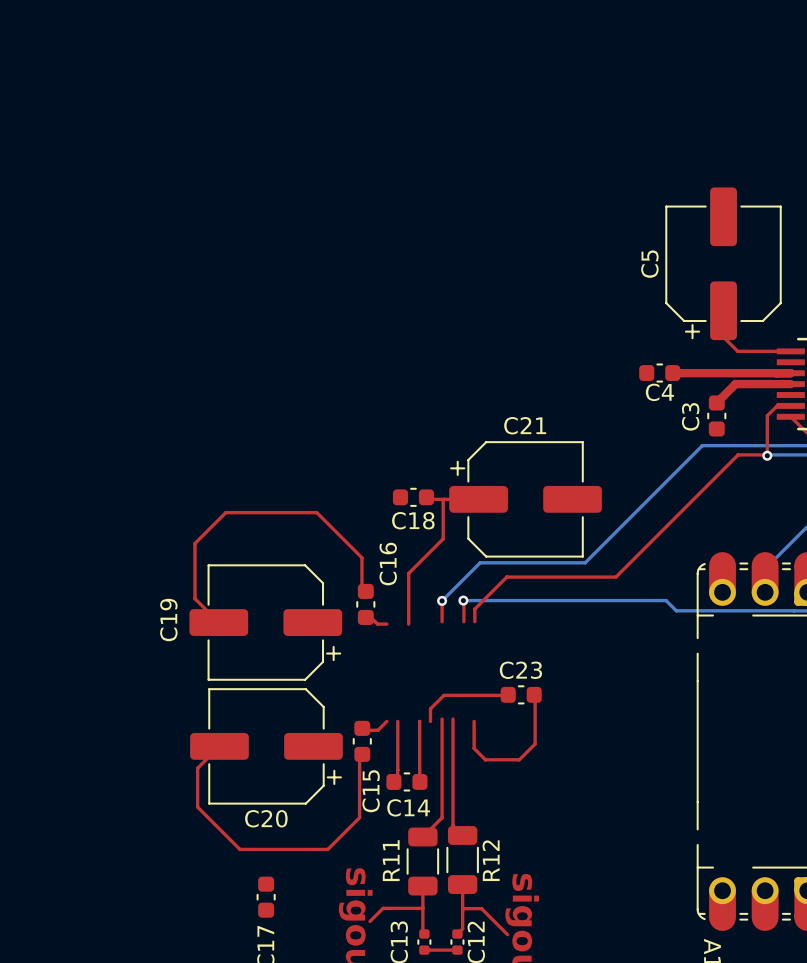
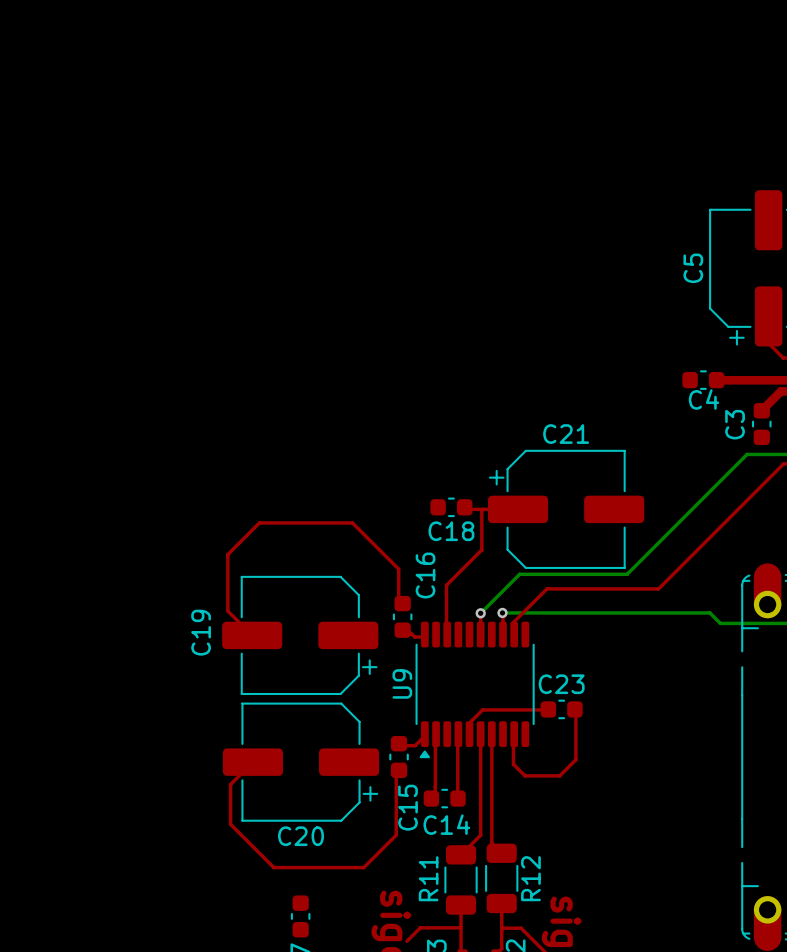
U9: none -> (475, 689)

